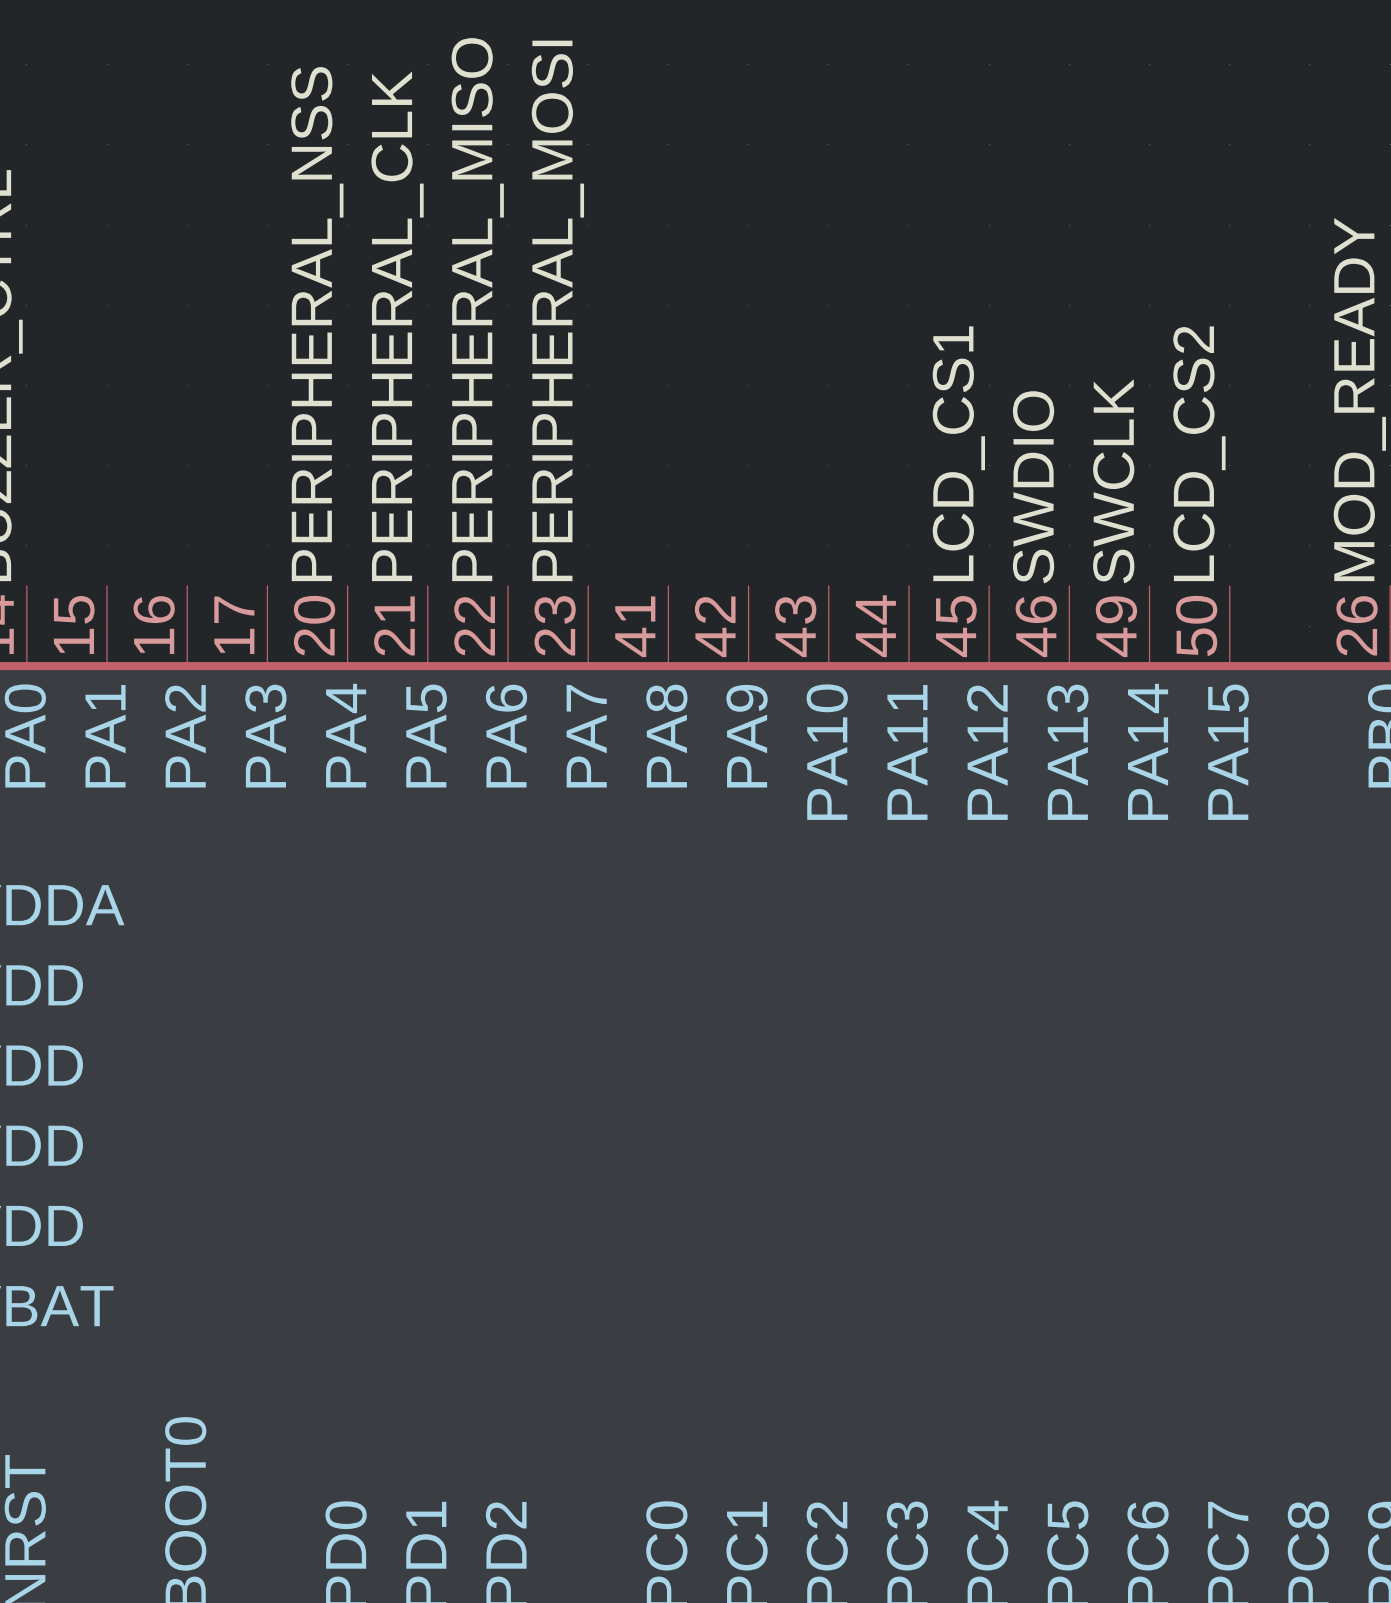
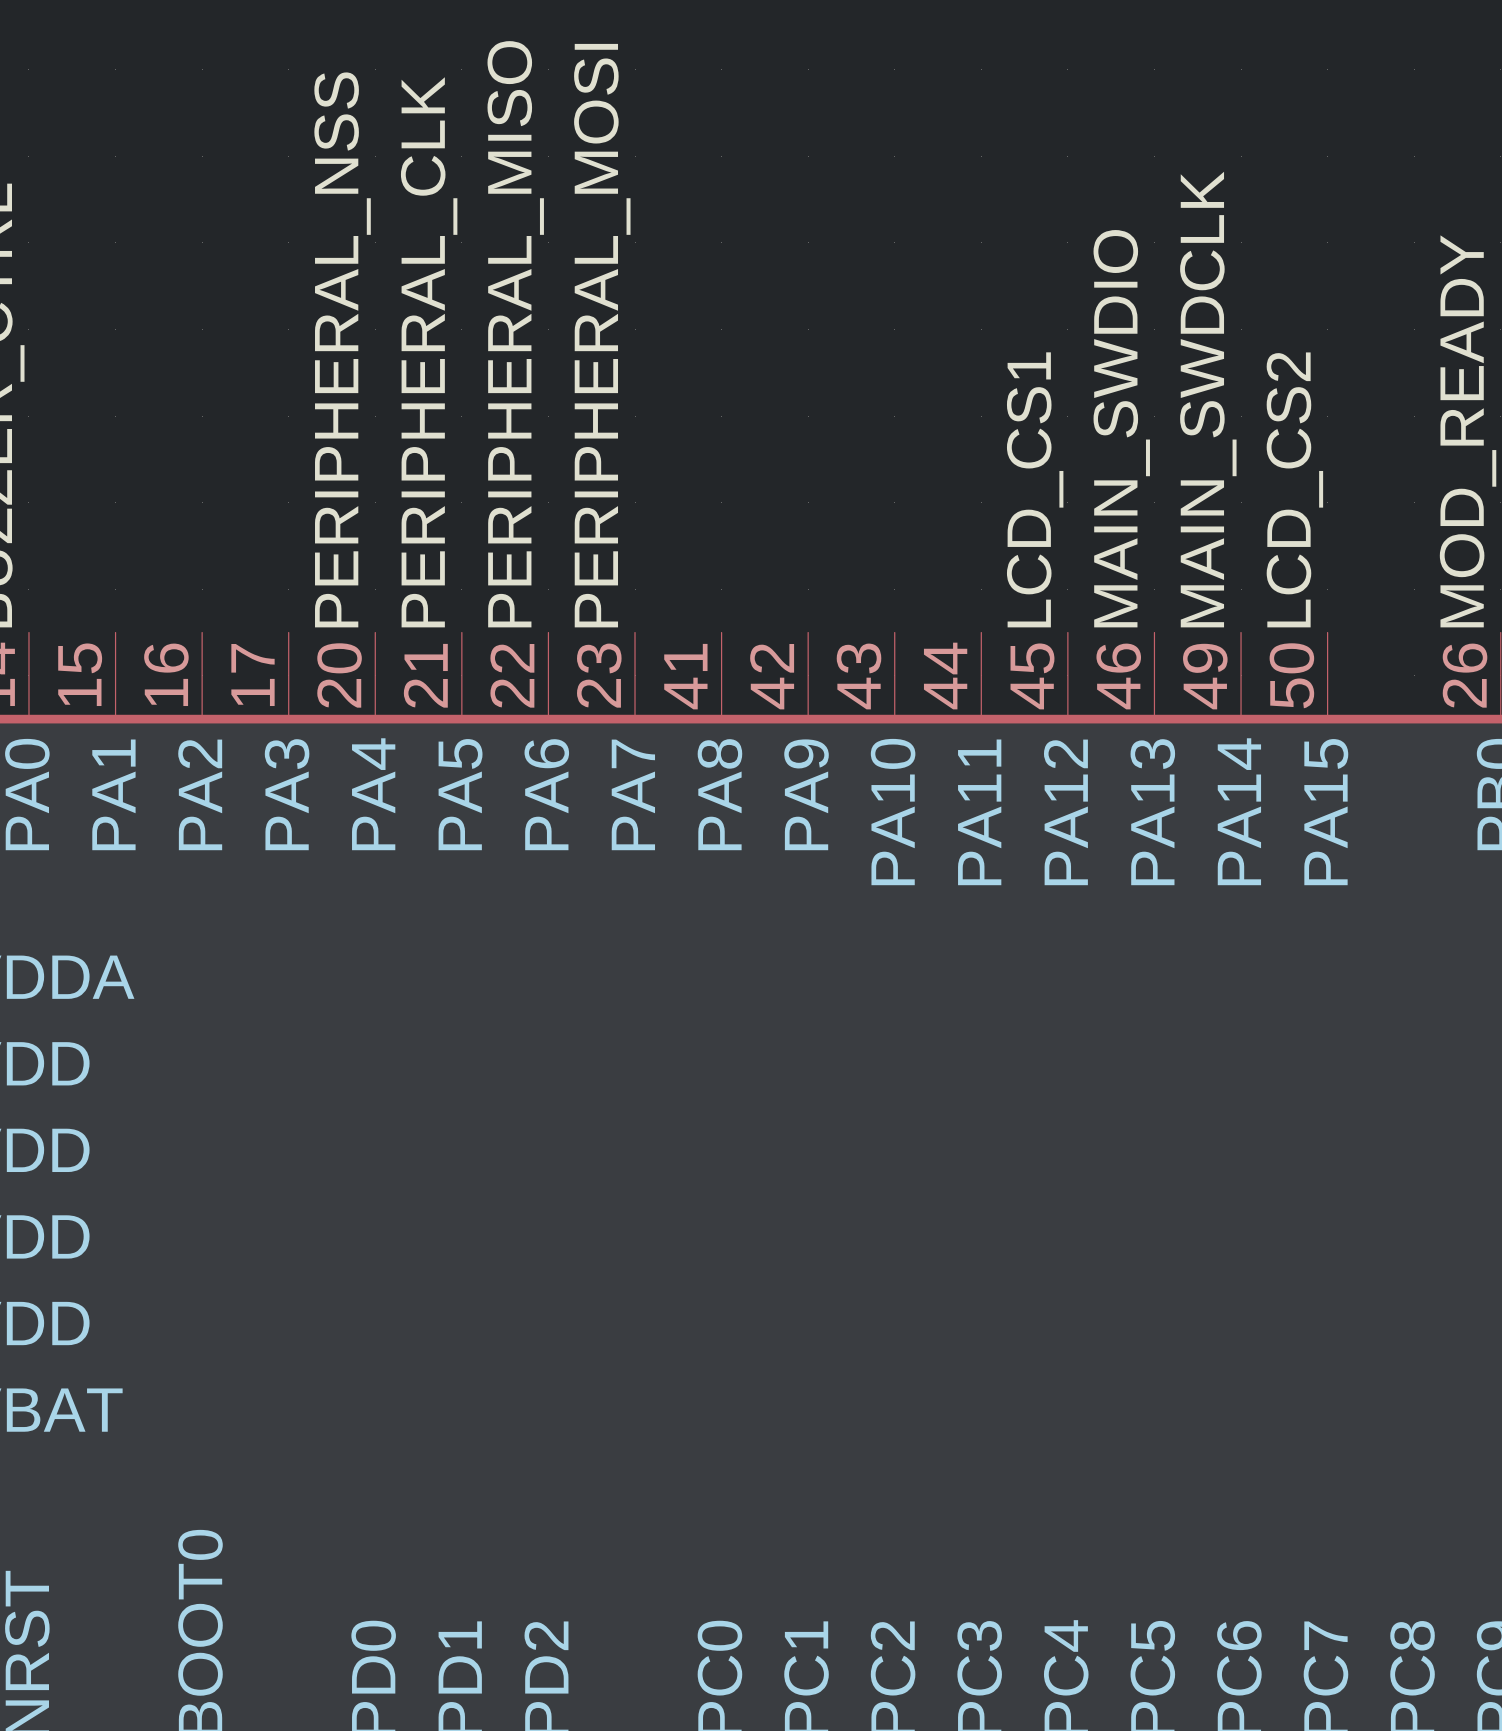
label: SWCLK (1113, 481) -> MAIN_SWDCLK (1208, 399)
label: SWDIO (1033, 487) -> MAIN_SWDIO (1121, 428)

